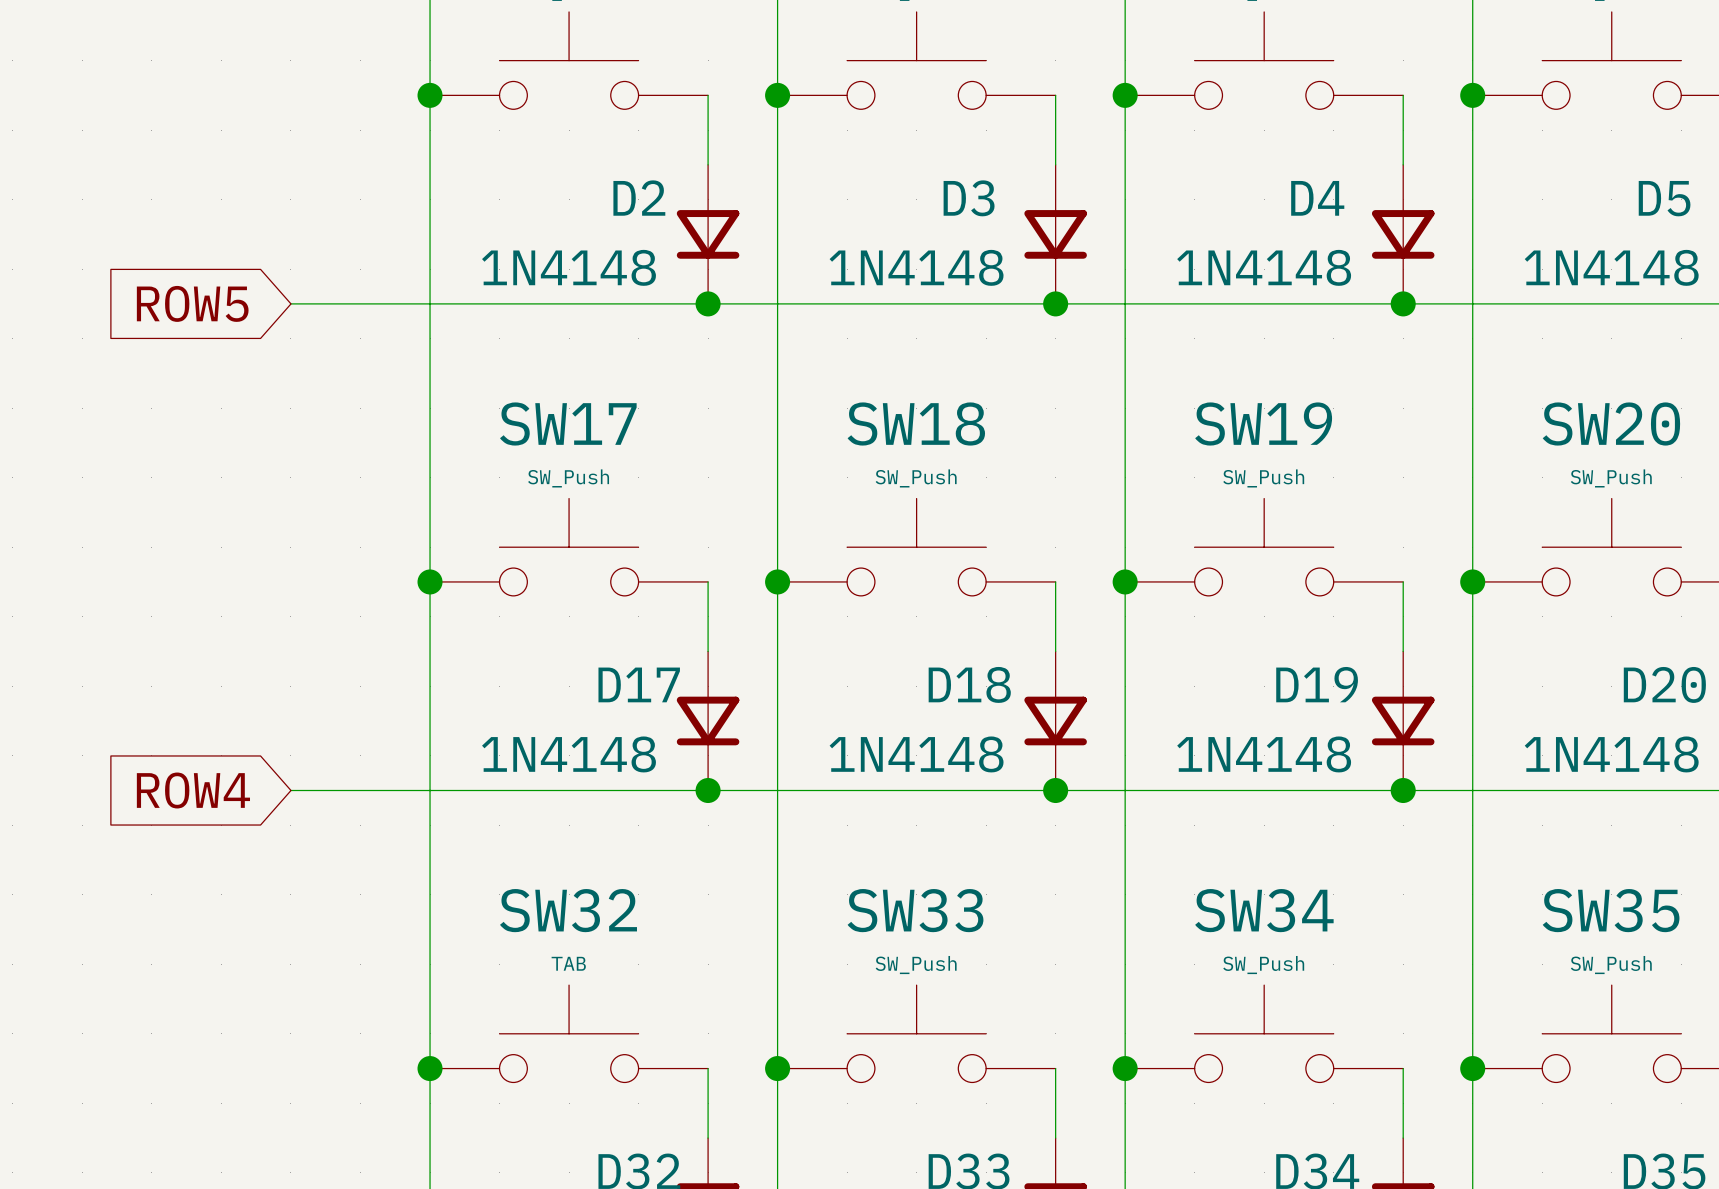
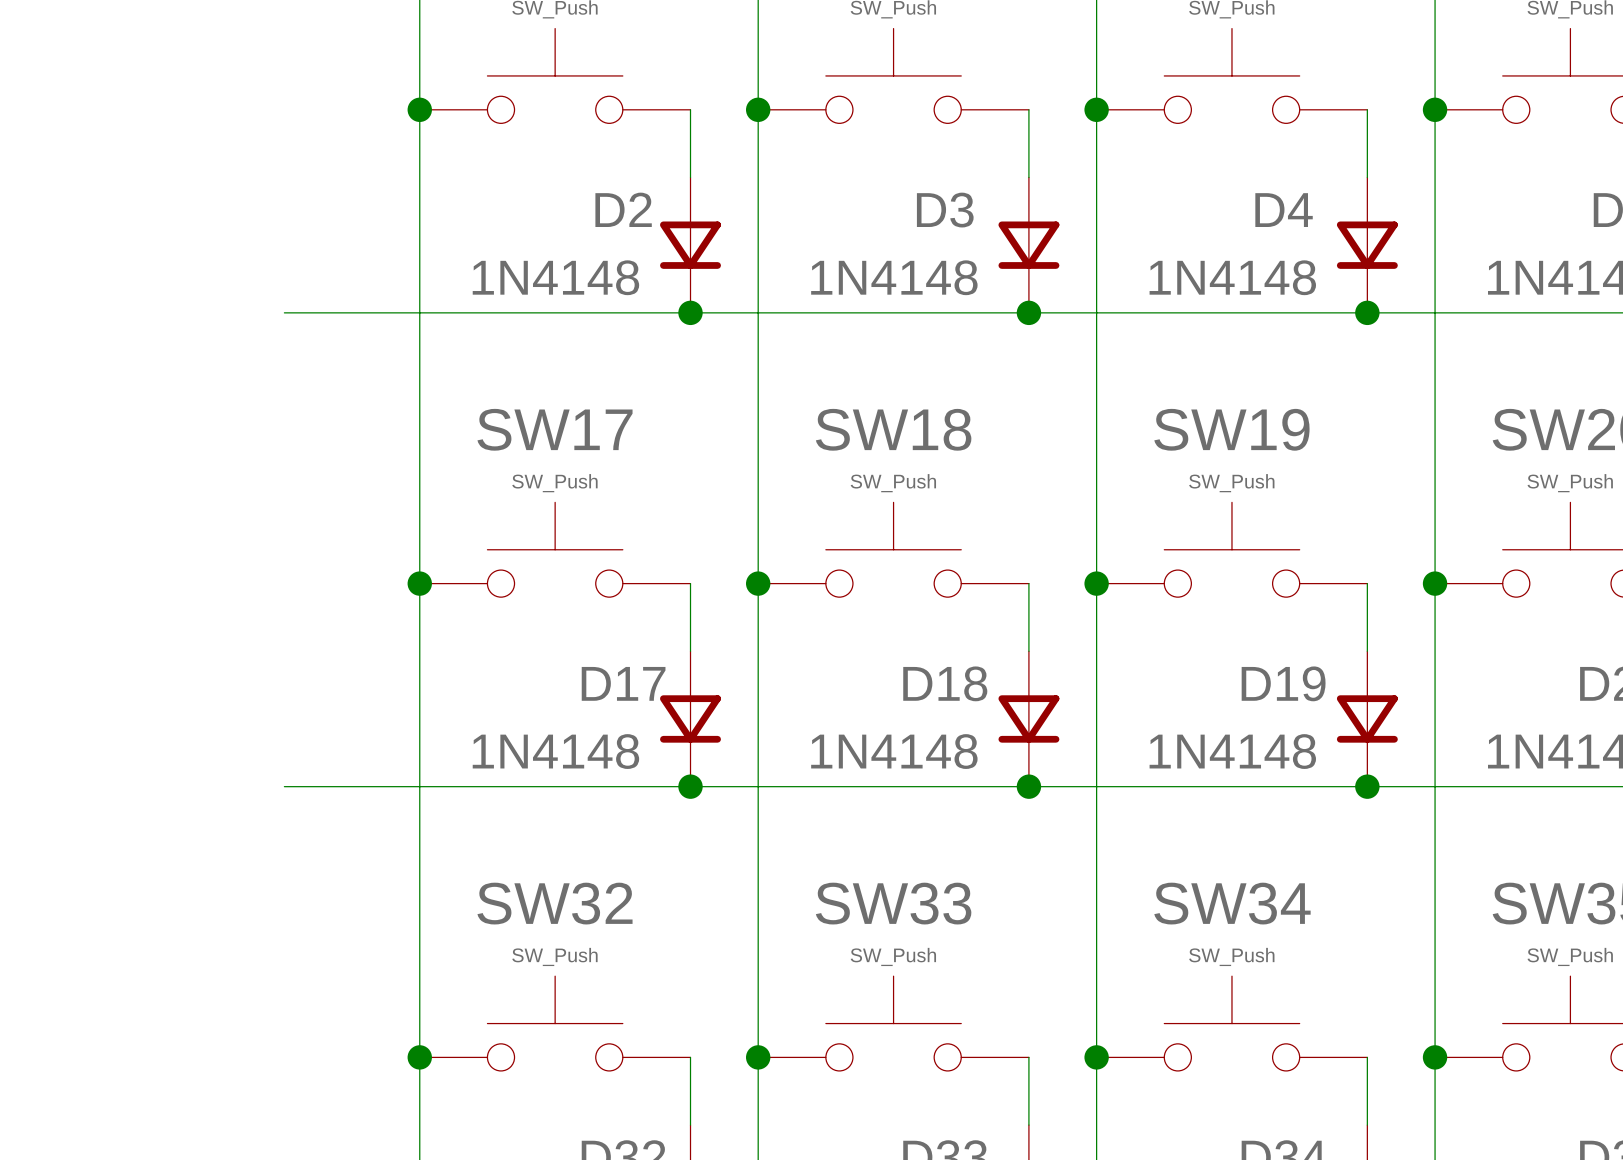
global label: ROW5 (192, 303) -> none
global label: ROW4 (193, 790) -> none
SW32 value: TAB (568, 963) -> SW_Push (554, 956)

